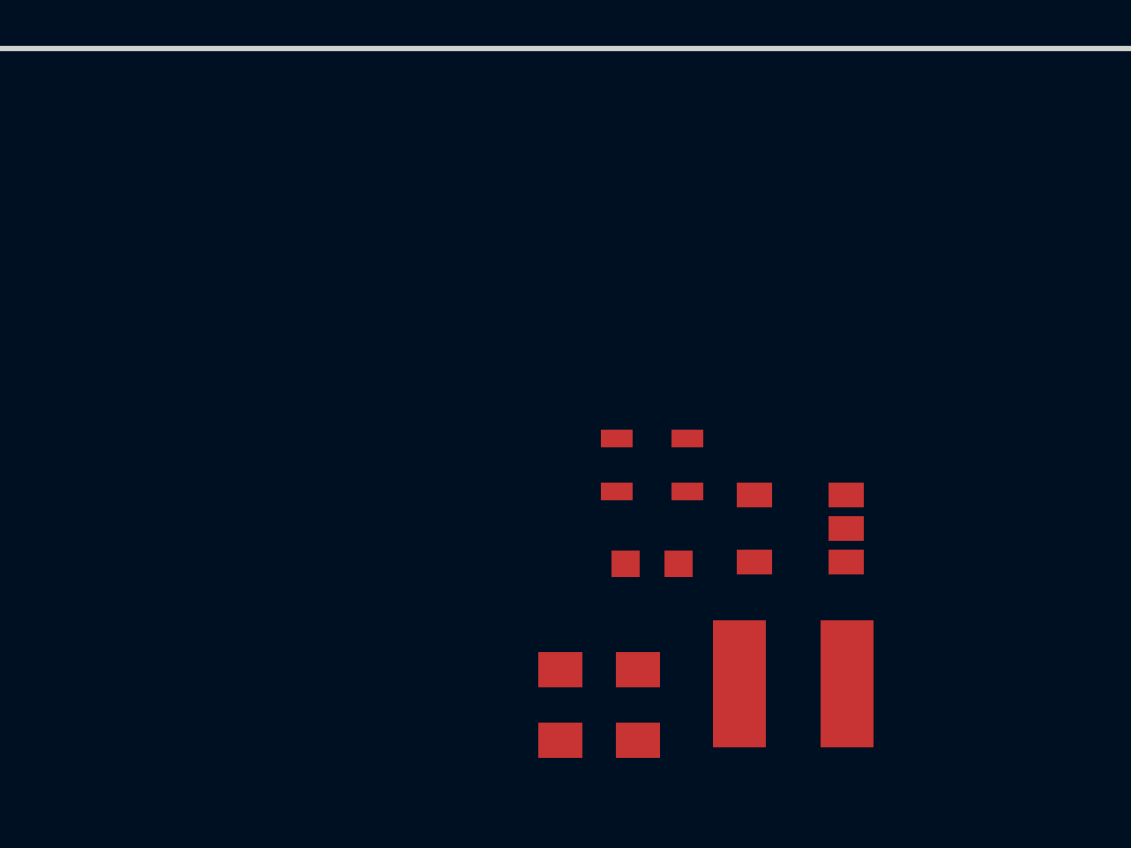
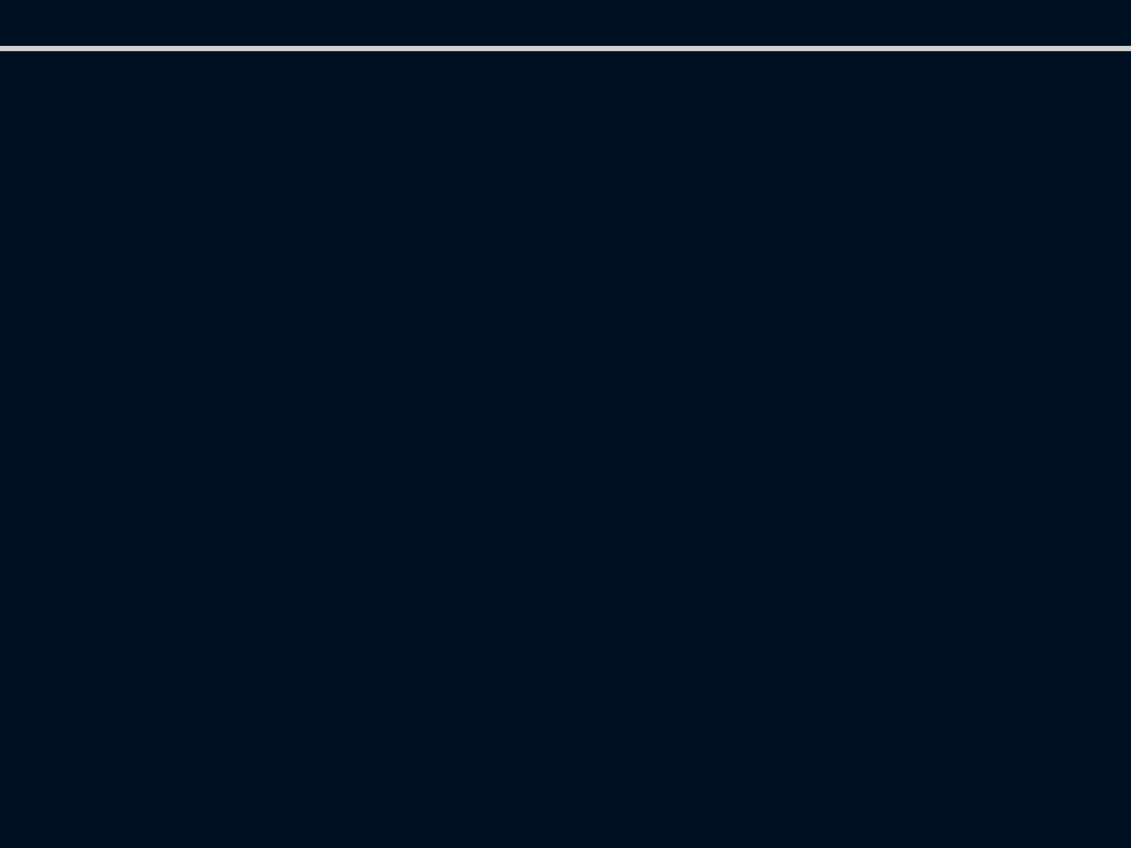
part: (616, 464) -> none
part: (687, 464) -> none
part: (800, 528) -> none
part: (652, 563) -> none
part: (793, 683) -> none
part: (560, 704) -> none
part: (637, 704) -> none

